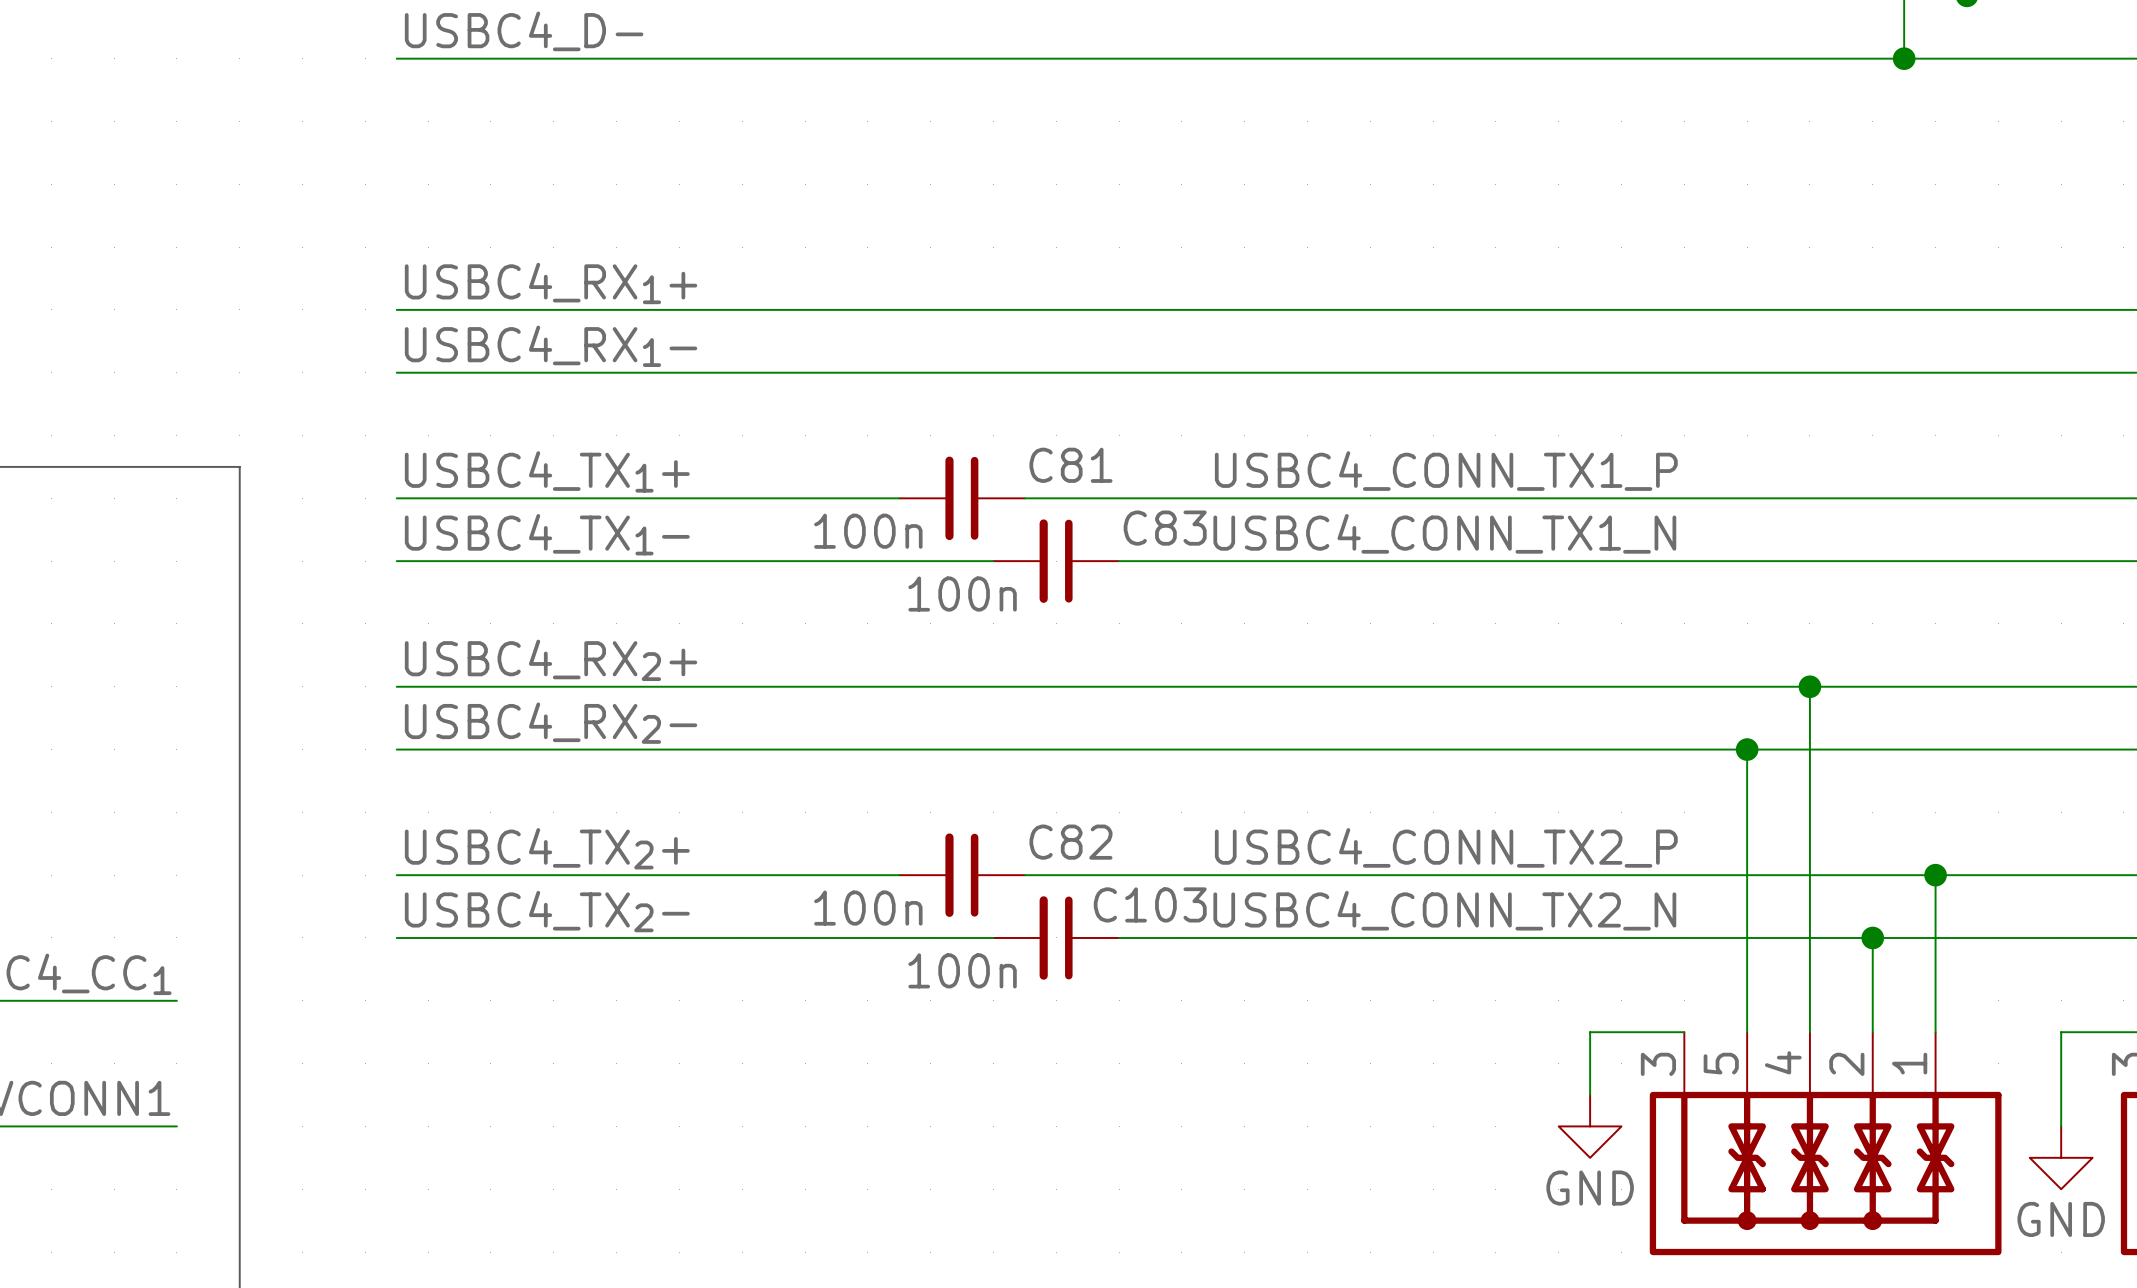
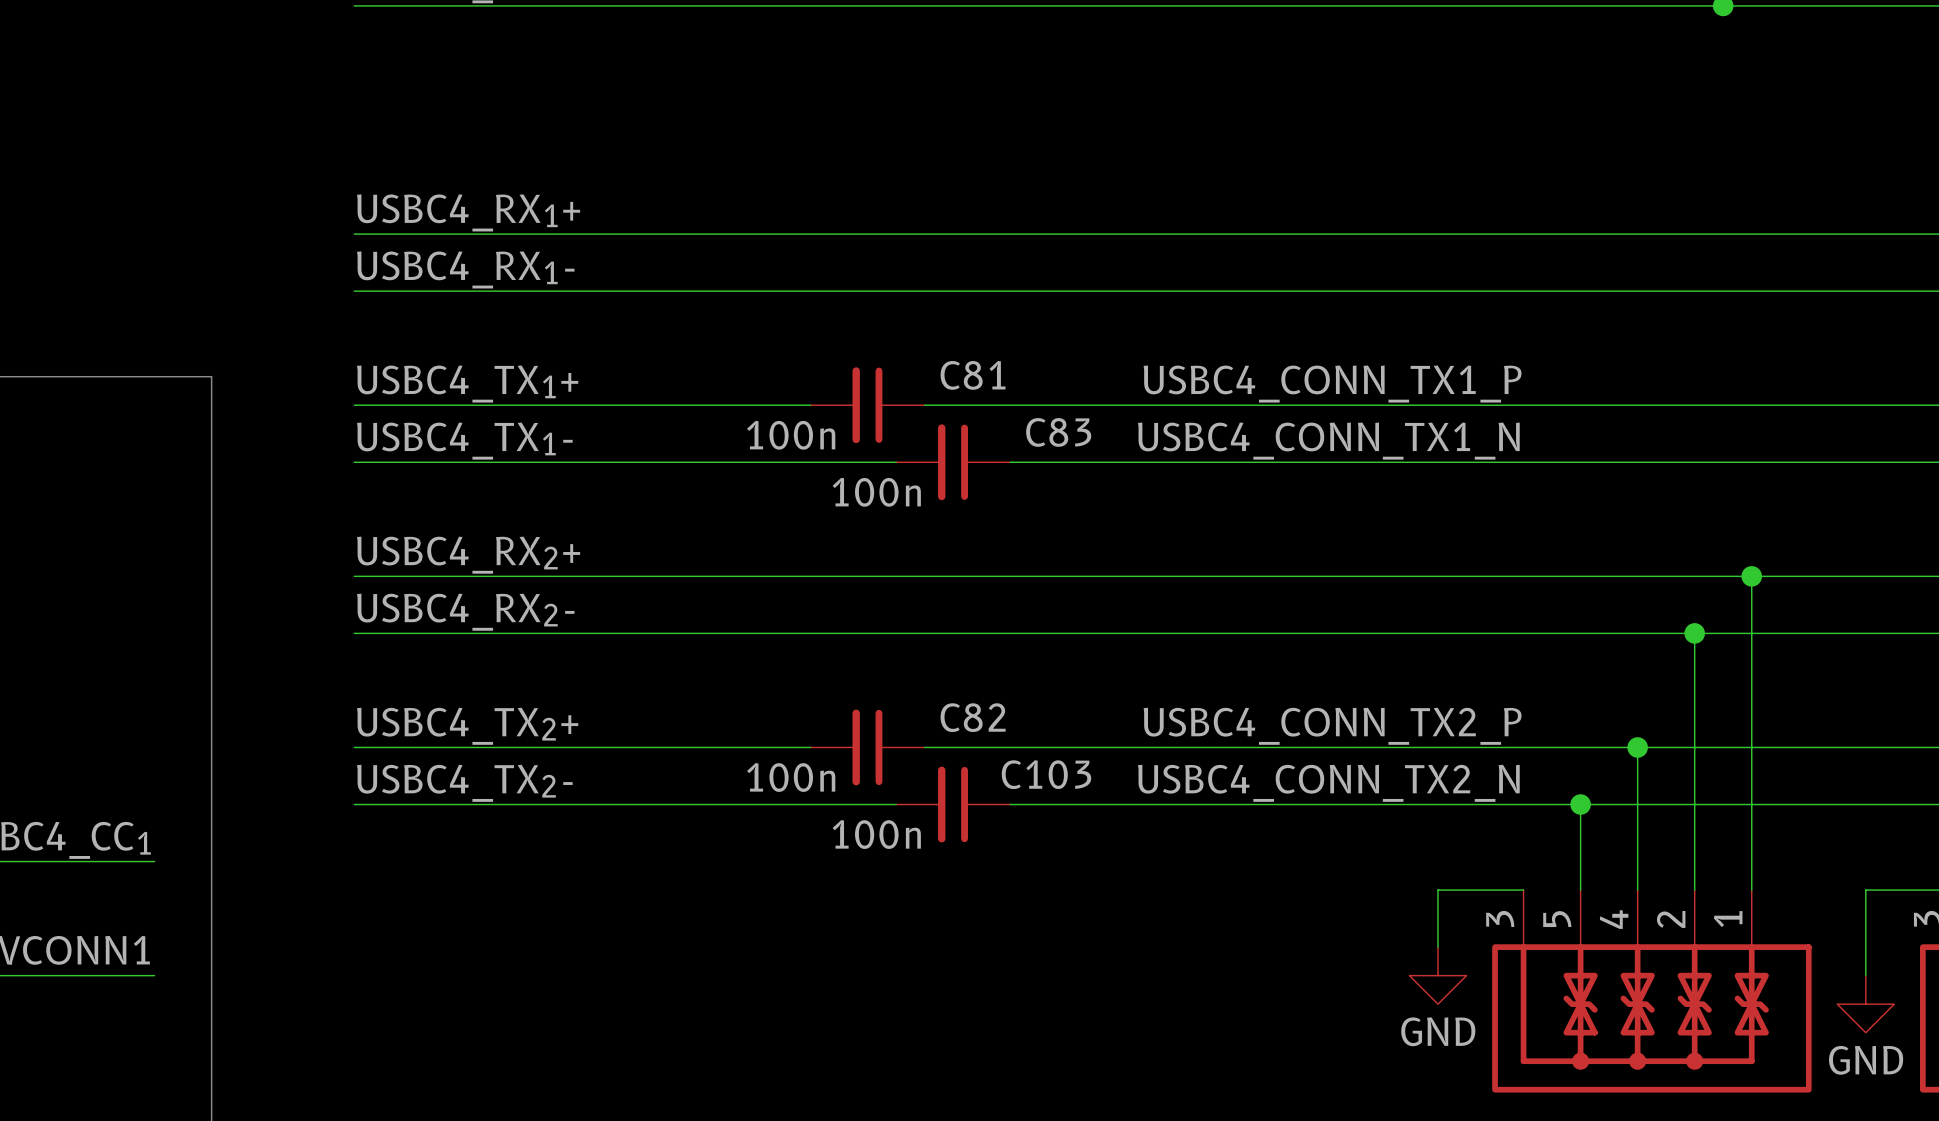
wire: (1809, 686) (1809, 875) -> (1694, 633) (1694, 804)
junction: (1809, 686) -> none
junction: none -> (1751, 576)
wire: (1747, 749) (1747, 937) -> (1751, 576) (1751, 747)
junction: (1747, 749) -> none
junction: none -> (1694, 633)
junction: none -> (1637, 747)
junction: (1935, 875) -> none
junction: none -> (1580, 804)
junction: (1872, 937) -> none

